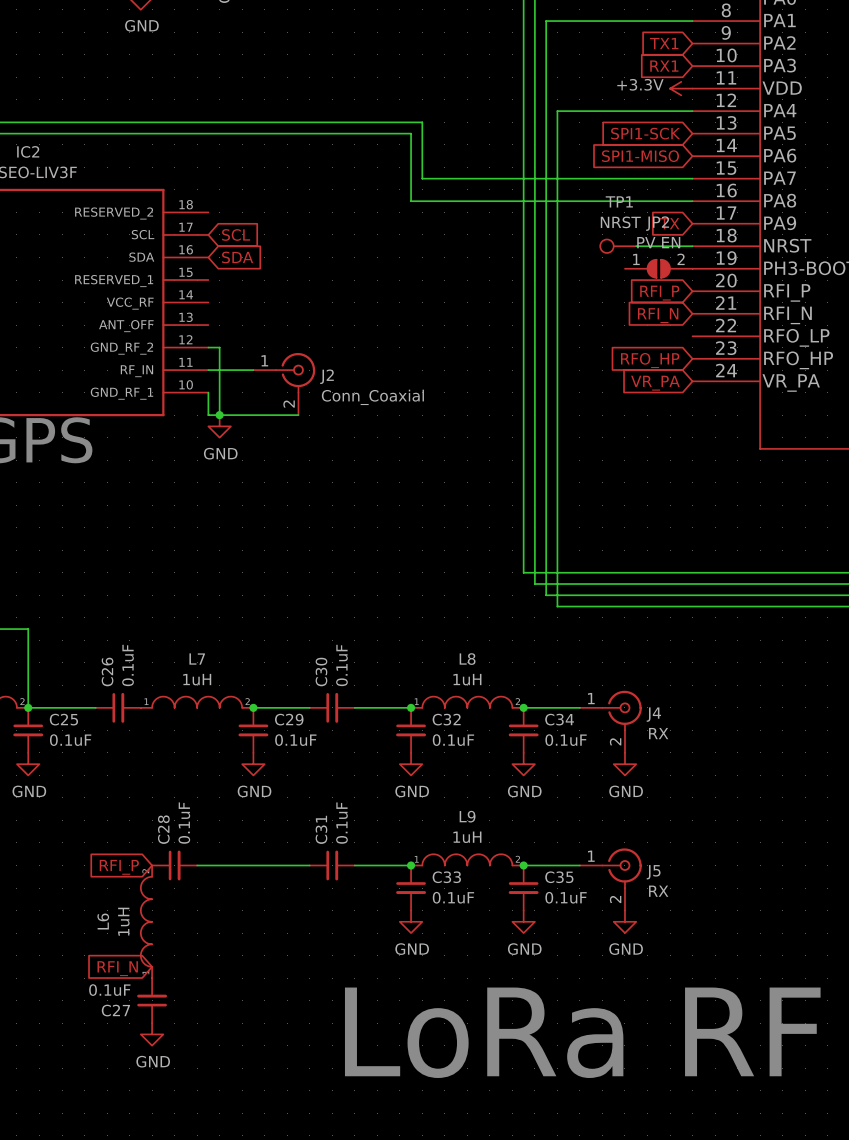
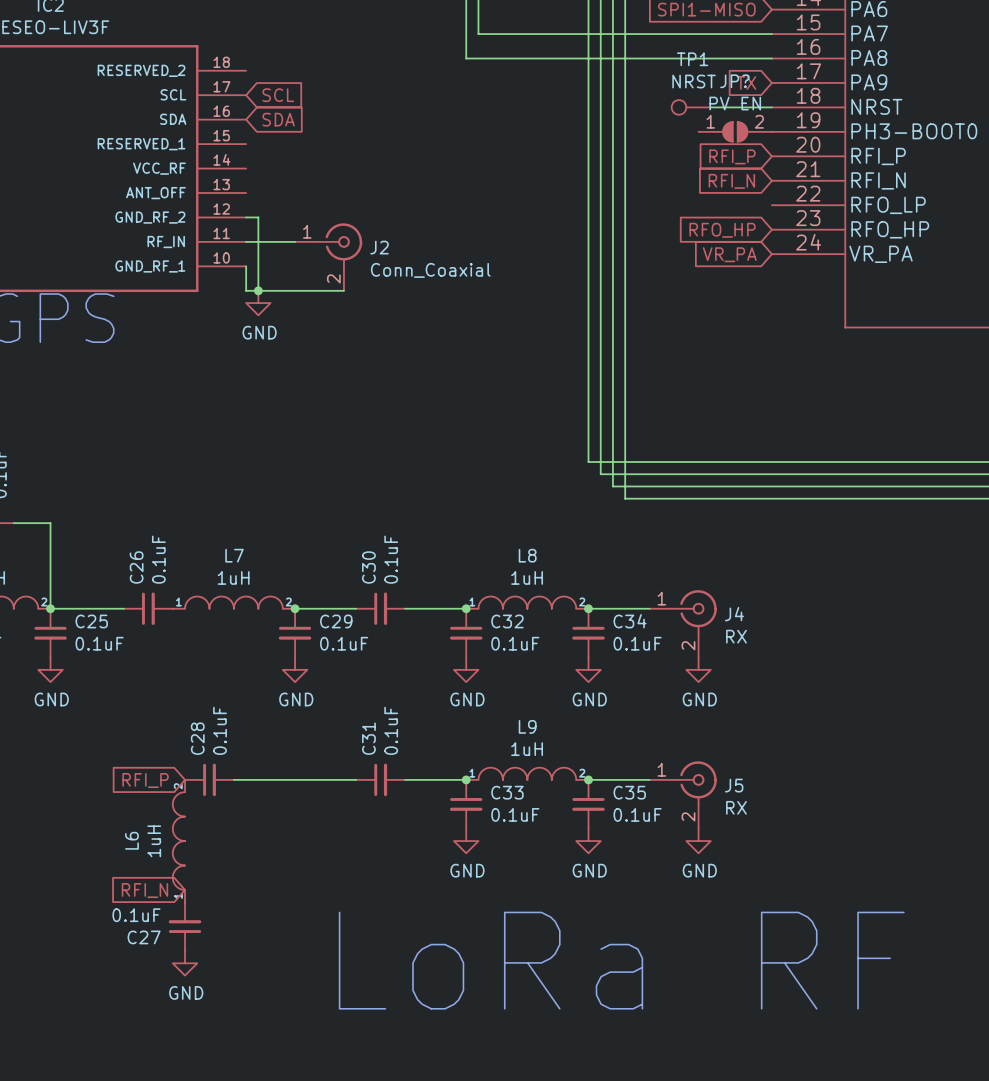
JP2 name: JP2 (657, 223) -> JP? (734, 81)

